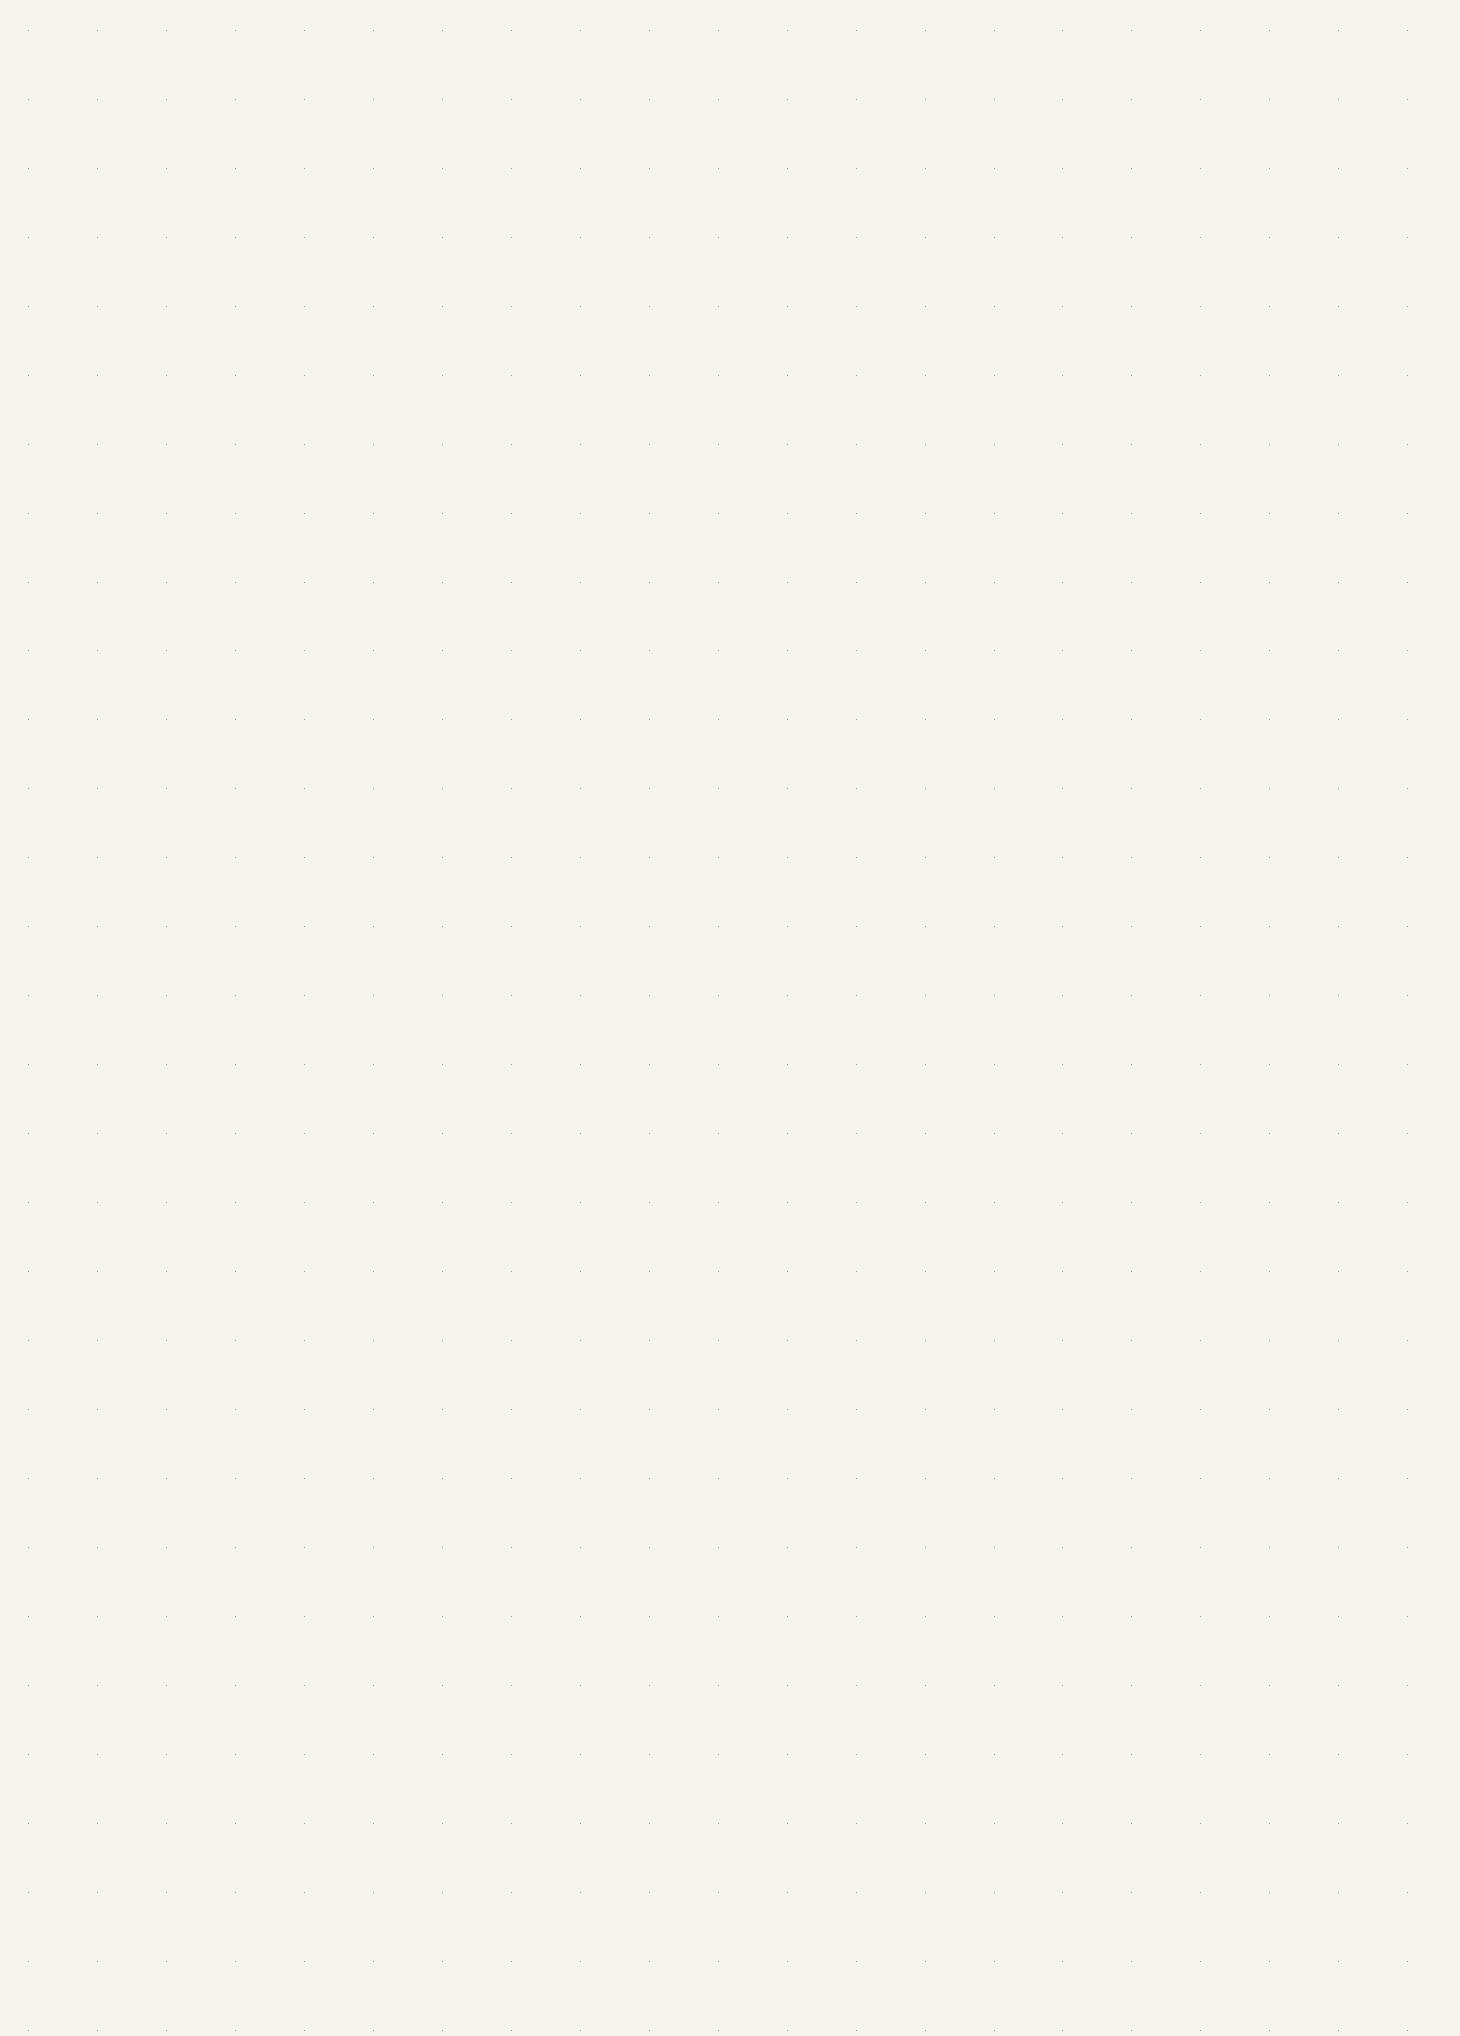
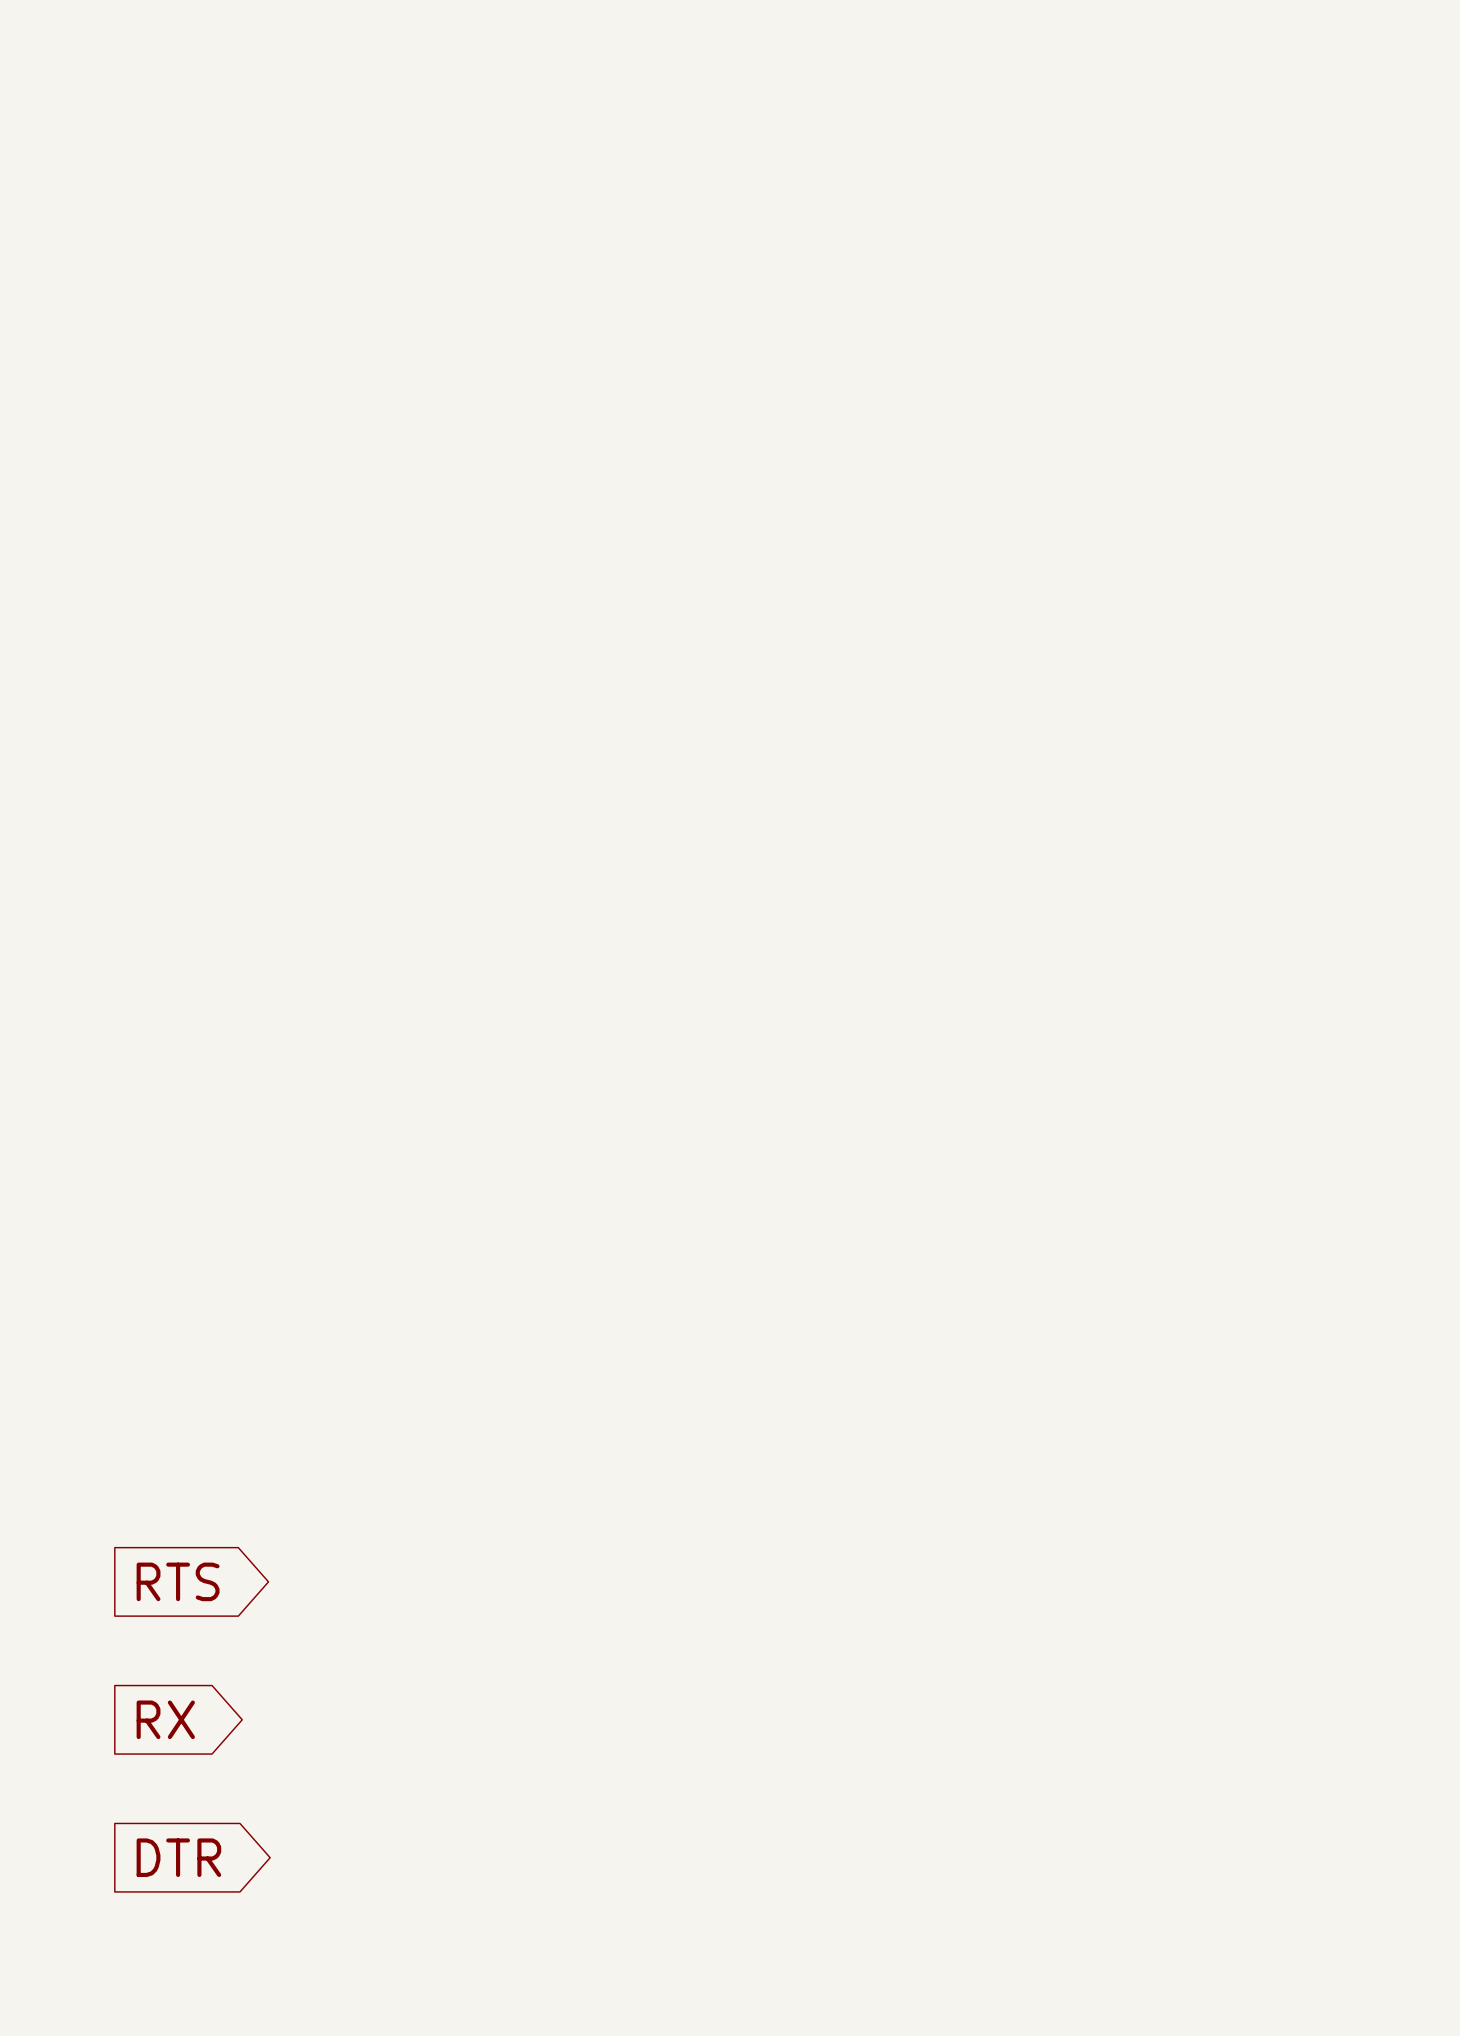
global label: none -> RTS (178, 1581)
global label: none -> RX (165, 1719)
global label: none -> DTR (178, 1857)

